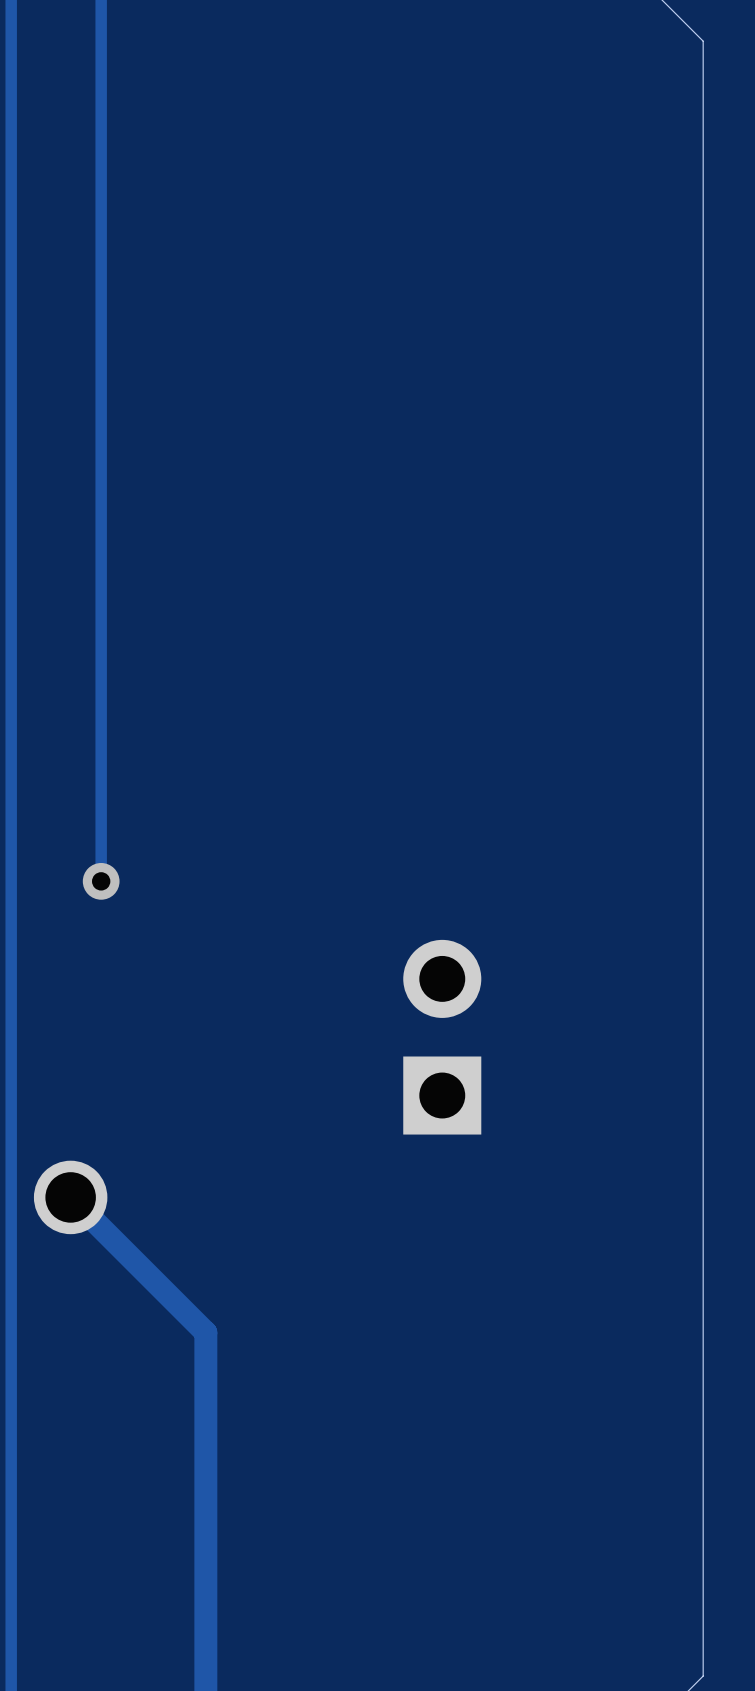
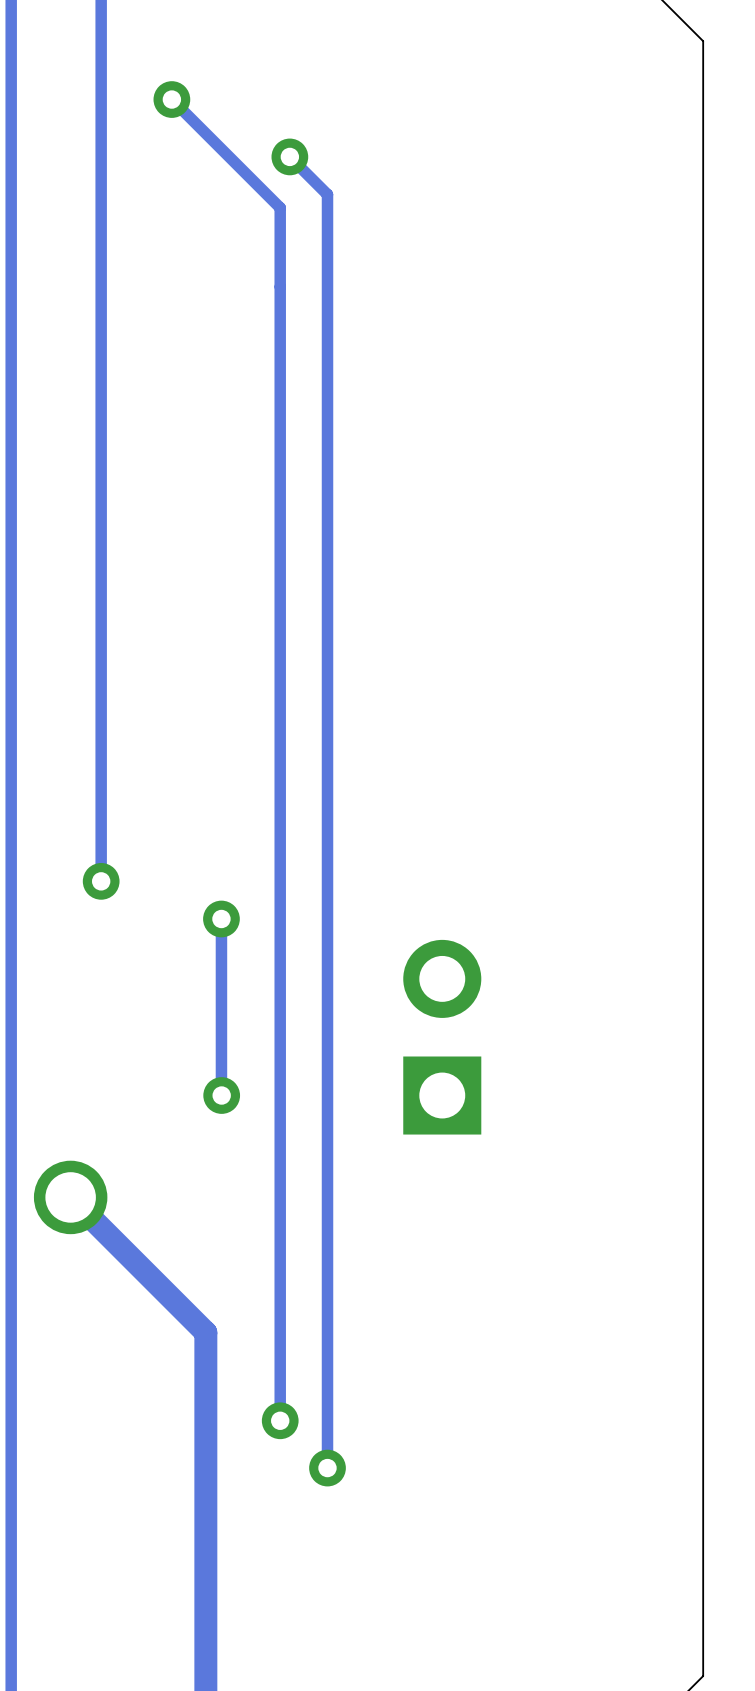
track: none -> (171, 99) (280, 207) (280, 1420)
via: none -> (171, 99)
track: none -> (289, 156) (327, 194) (327, 1468)
via: none -> (289, 156)
track: none -> (221, 919) (221, 1095)
via: none -> (221, 919)
via: none -> (221, 1095)
via: none -> (280, 1420)
via: none -> (327, 1468)

